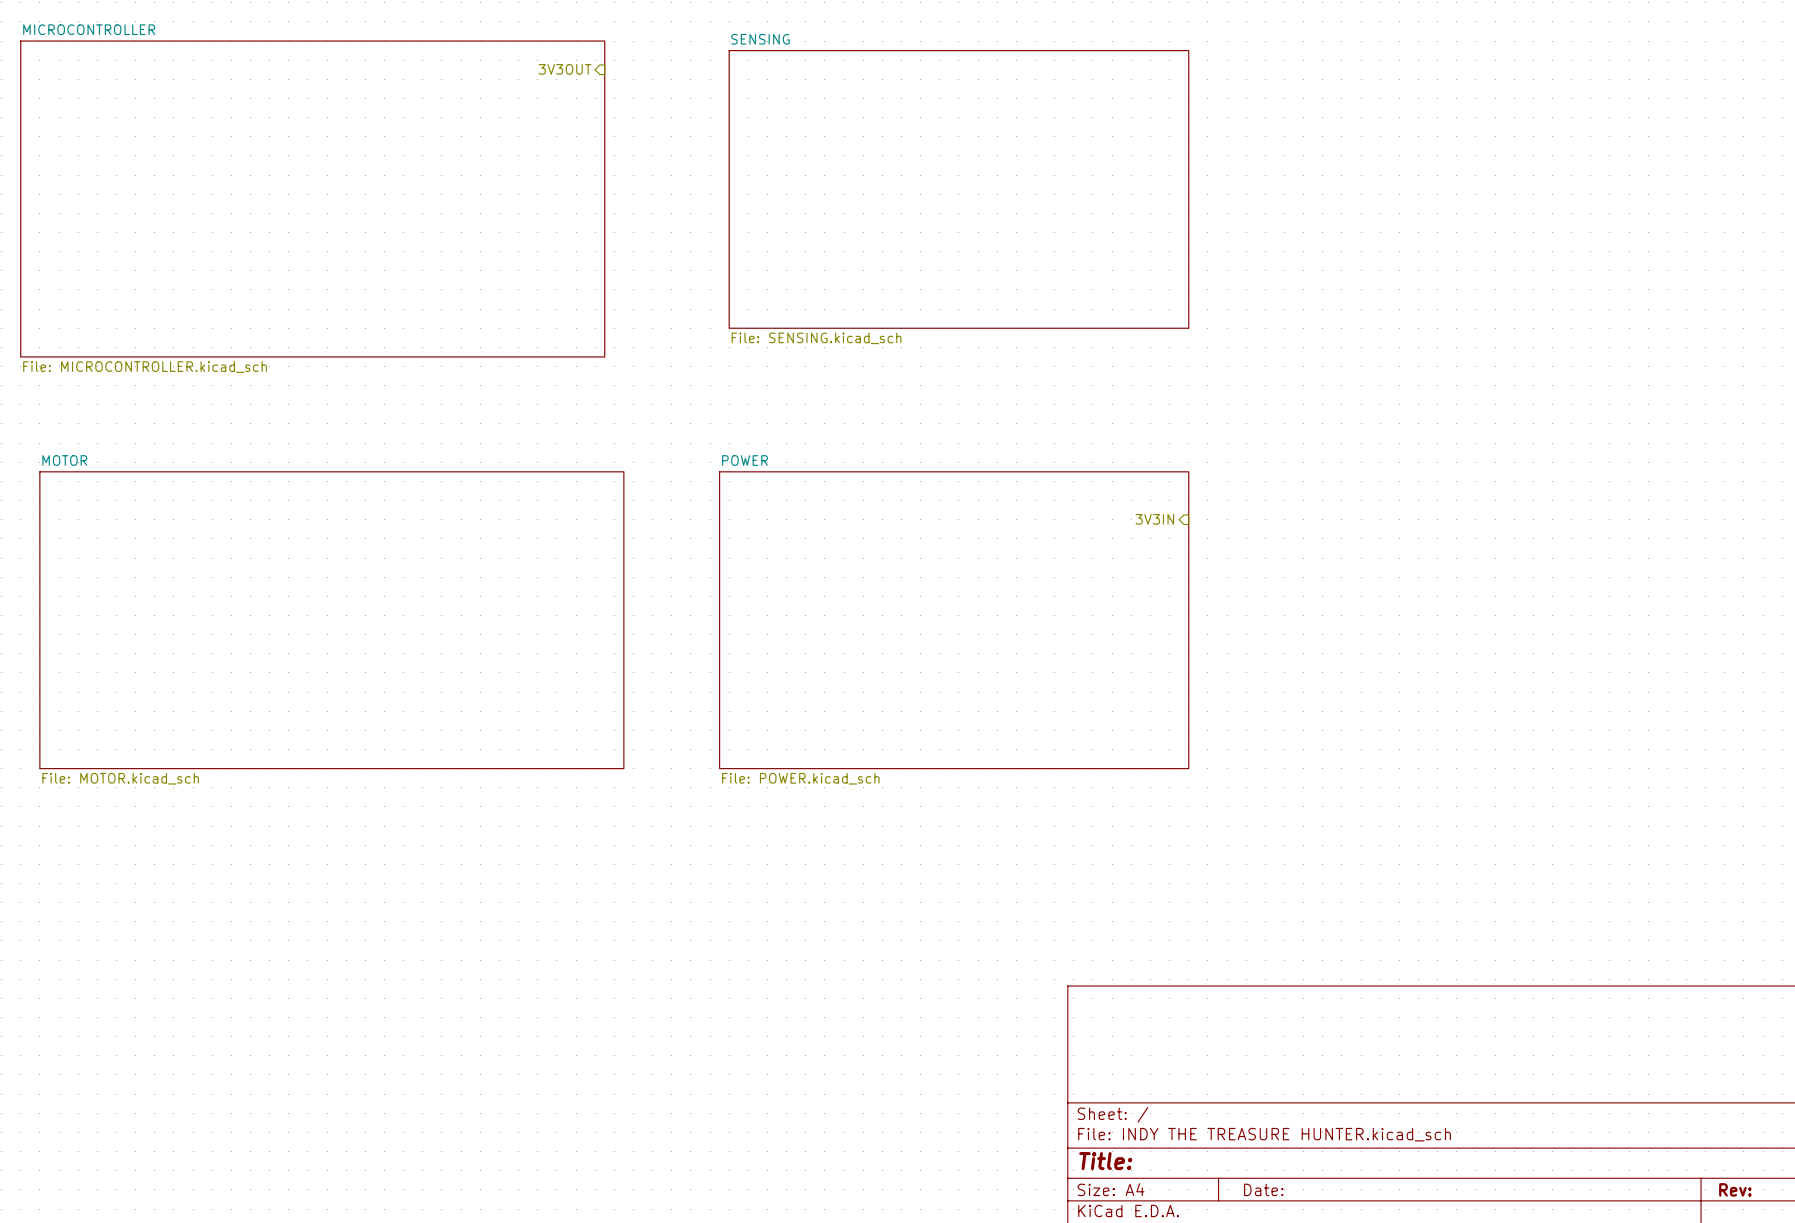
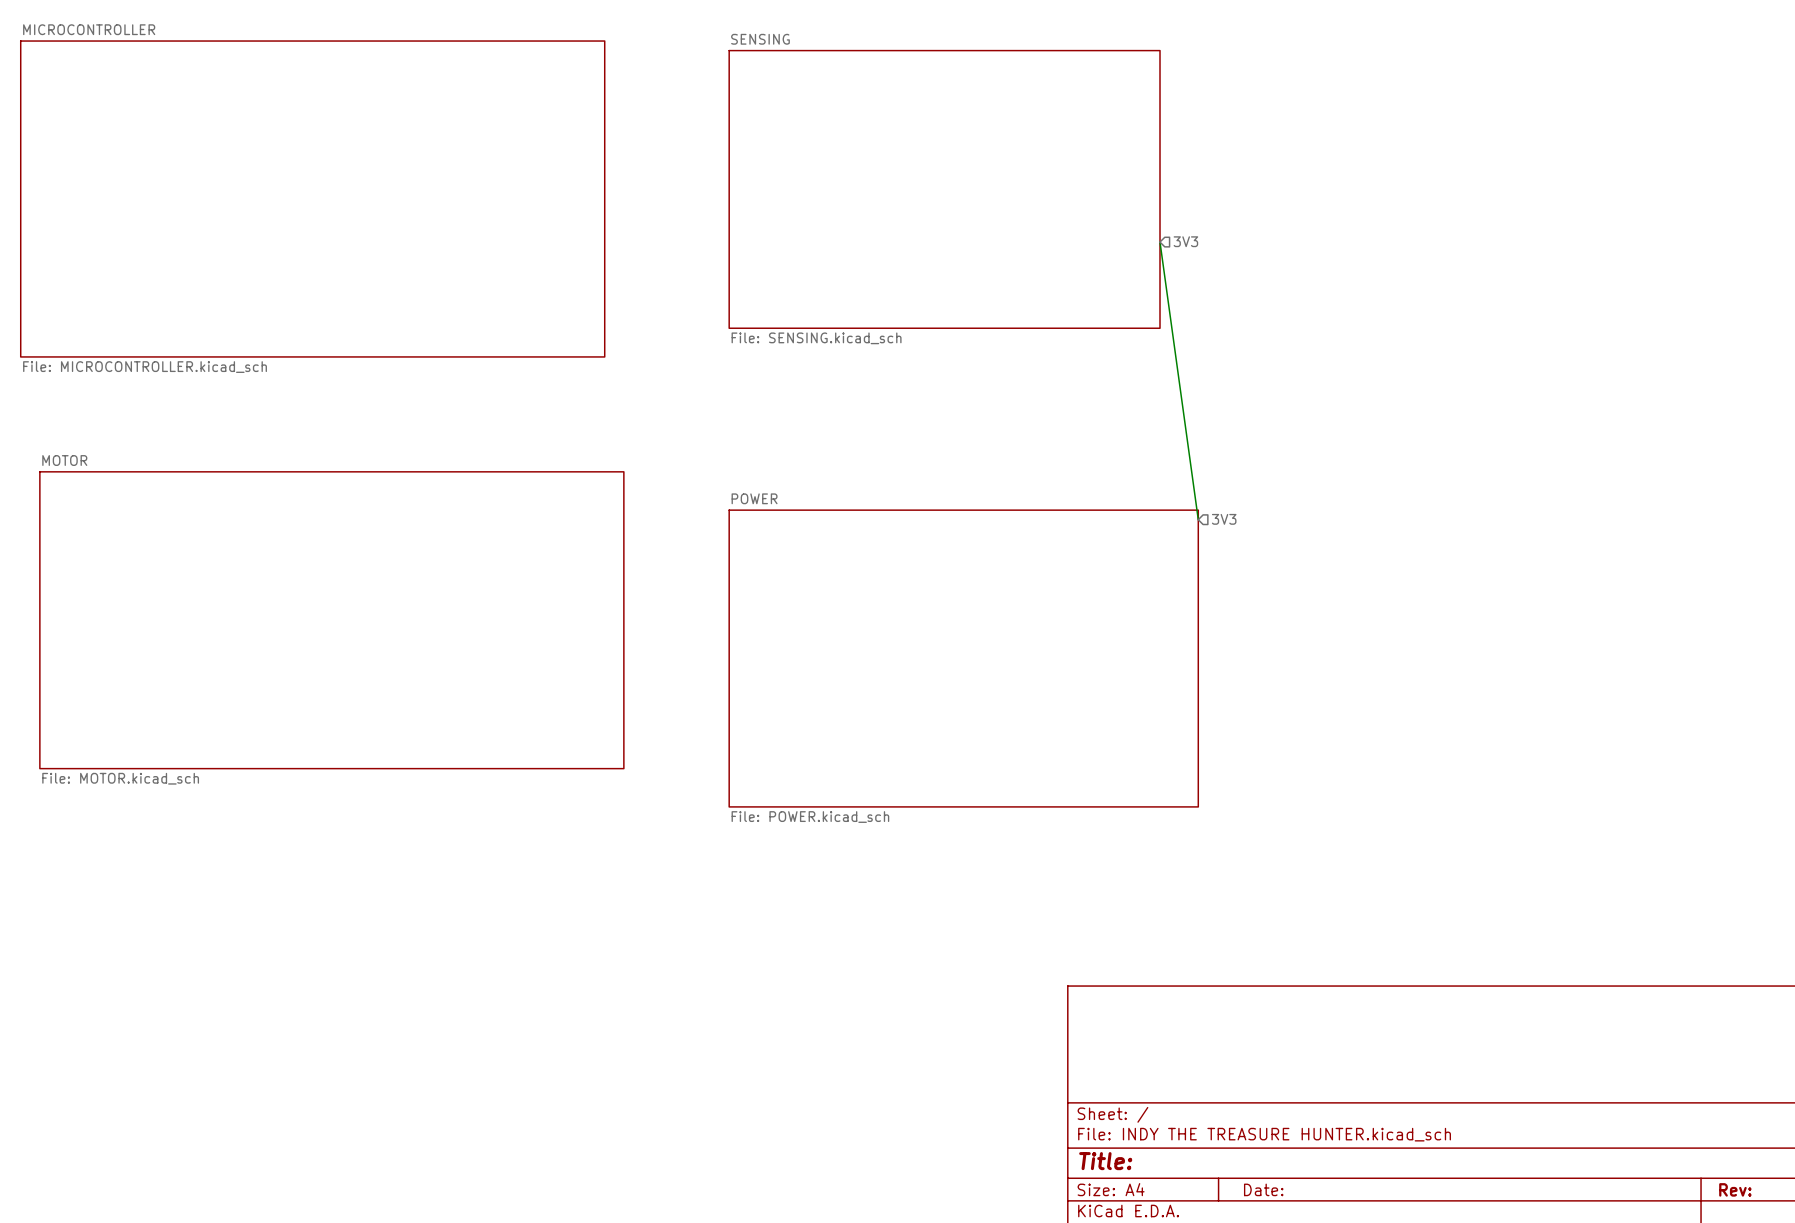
hierarchical label: 3V3OUT (565, 69) -> none
sheet SENSING: none -> File: SENSING.kicad_sch (944, 189)
sheet SENSING: File: SENSING.kicad_sch (958, 189) -> none
hierarchical label: none -> 3V3 (1185, 241)
wire: none -> (1160, 242) (1198, 519)
hierarchical label: 3V3IN (1154, 519) -> none
hierarchical label: none -> 3V3 (1224, 519)
sheet POWER position: (954, 620) -> (963, 658)

